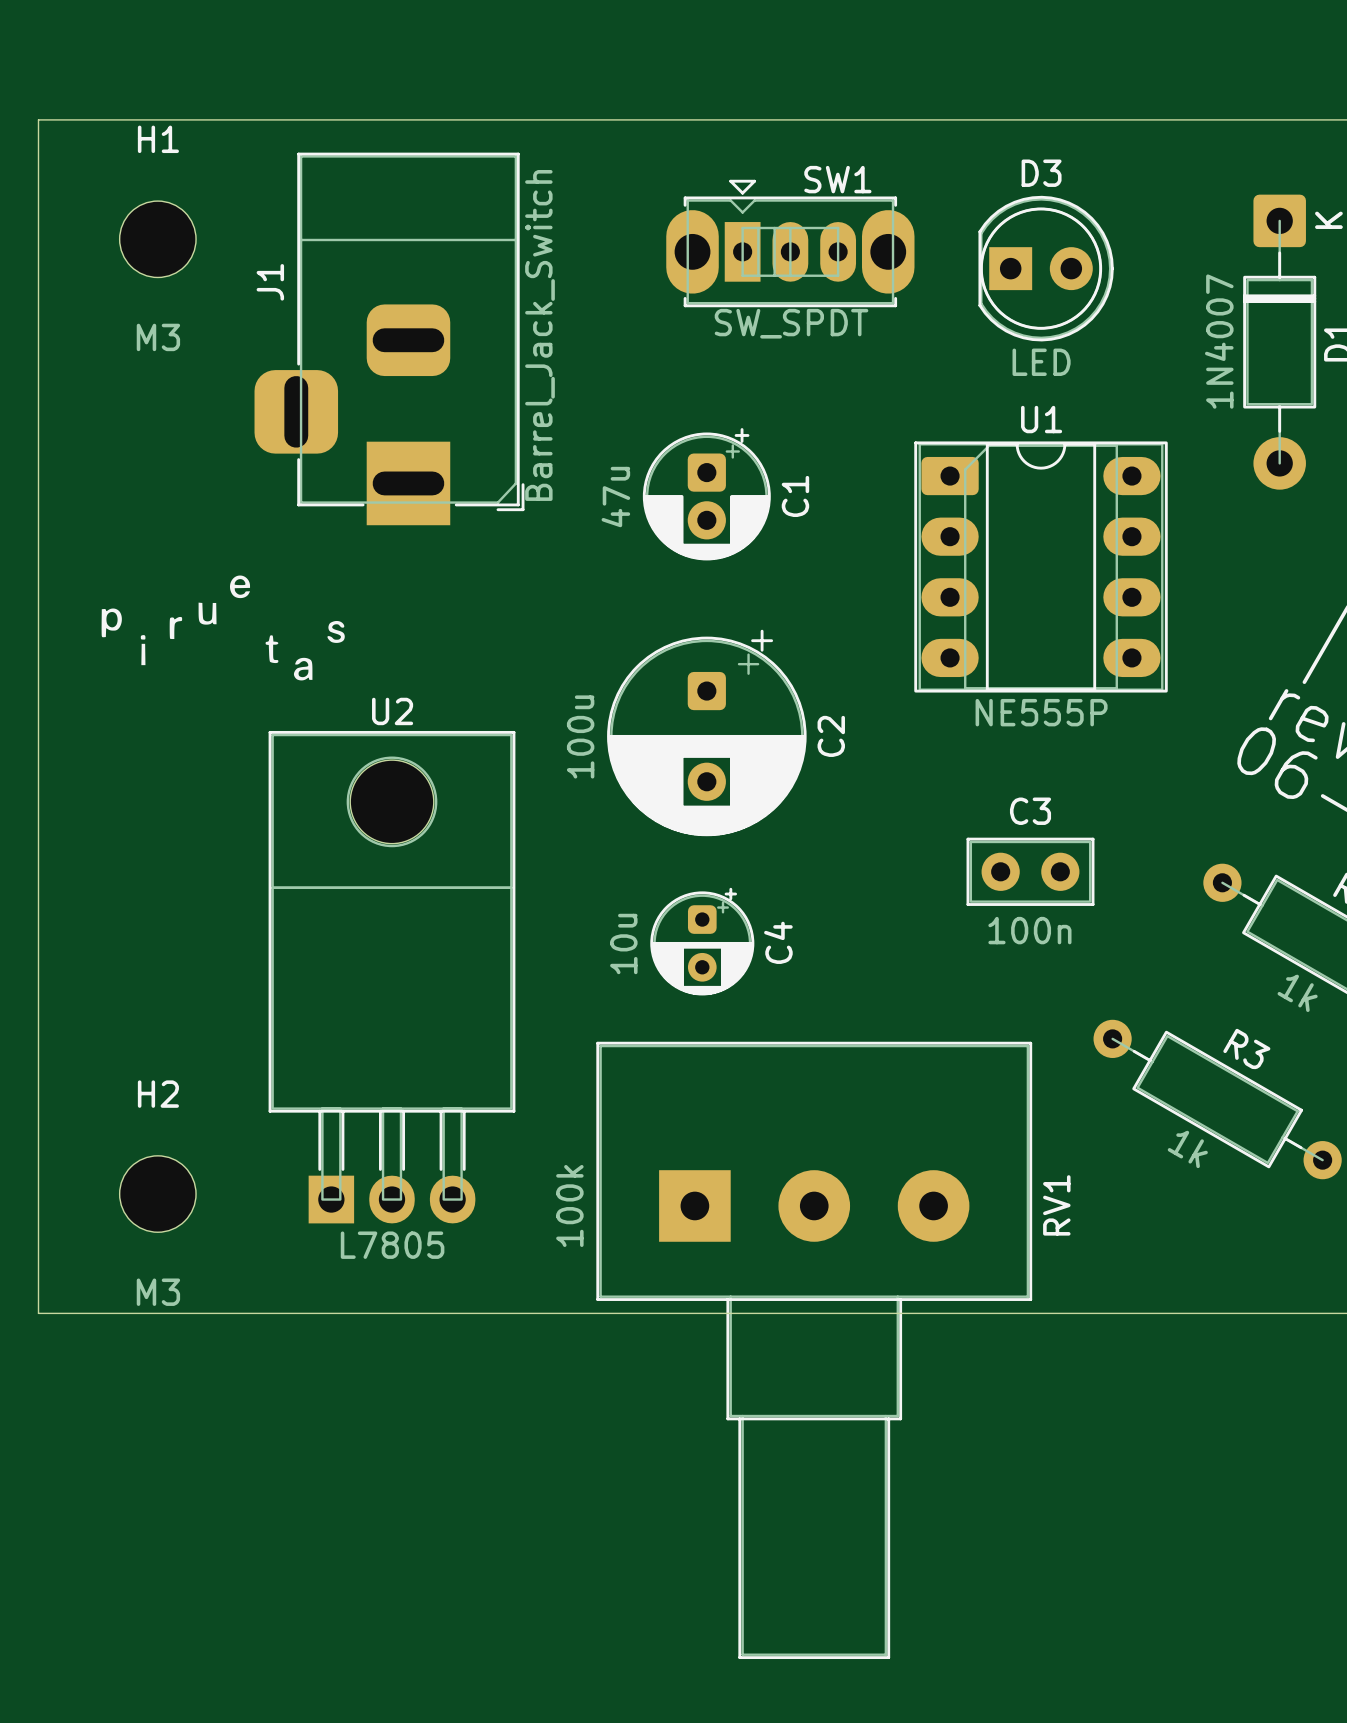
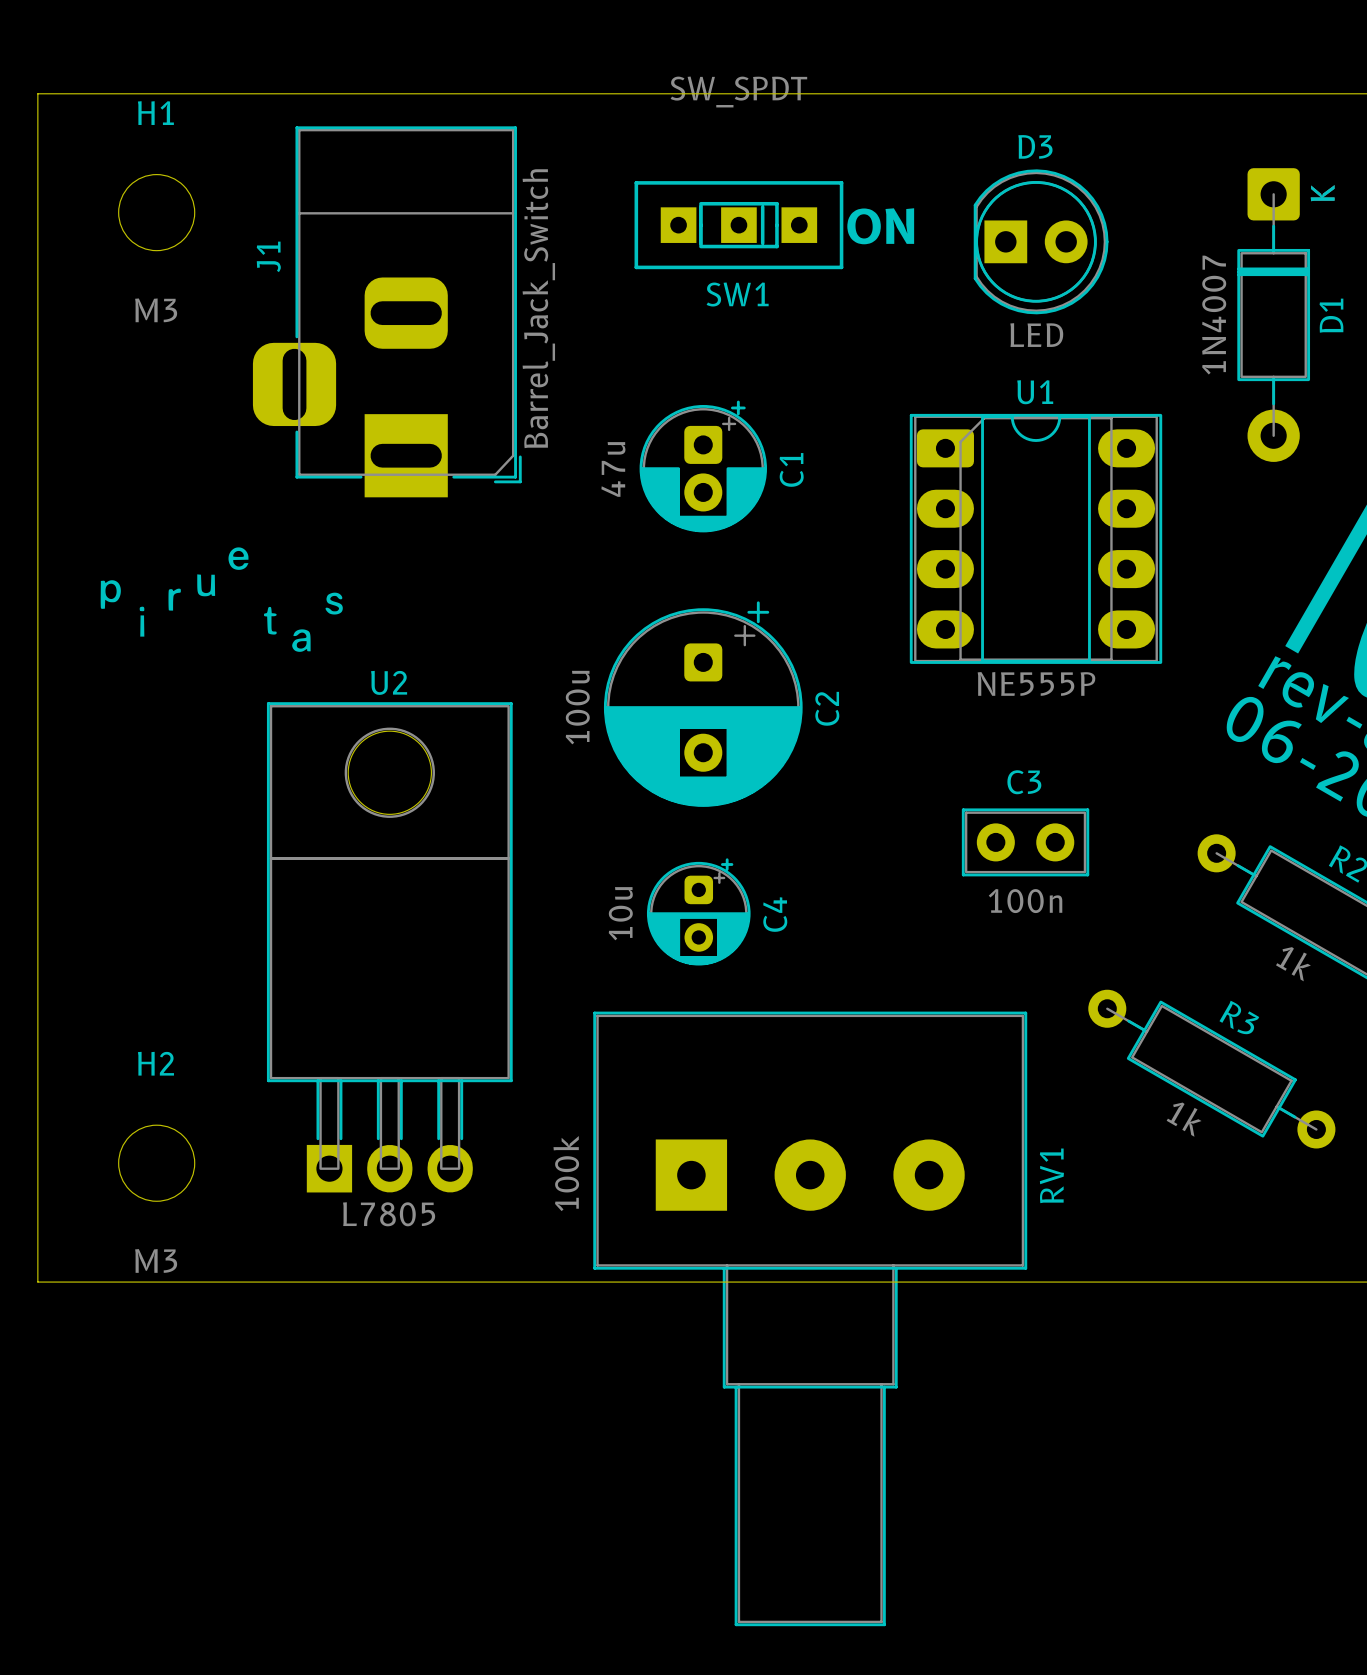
SW1 footprint: [666, 179, 915, 308] -> [634, 181, 844, 270]
SW1 name position: SW1 (837, 179) -> SW1 (737, 294)
text: none -> ON (880, 226)
SW1 value position: SW_SPDT (791, 323) -> SW_SPDT (738, 91)

